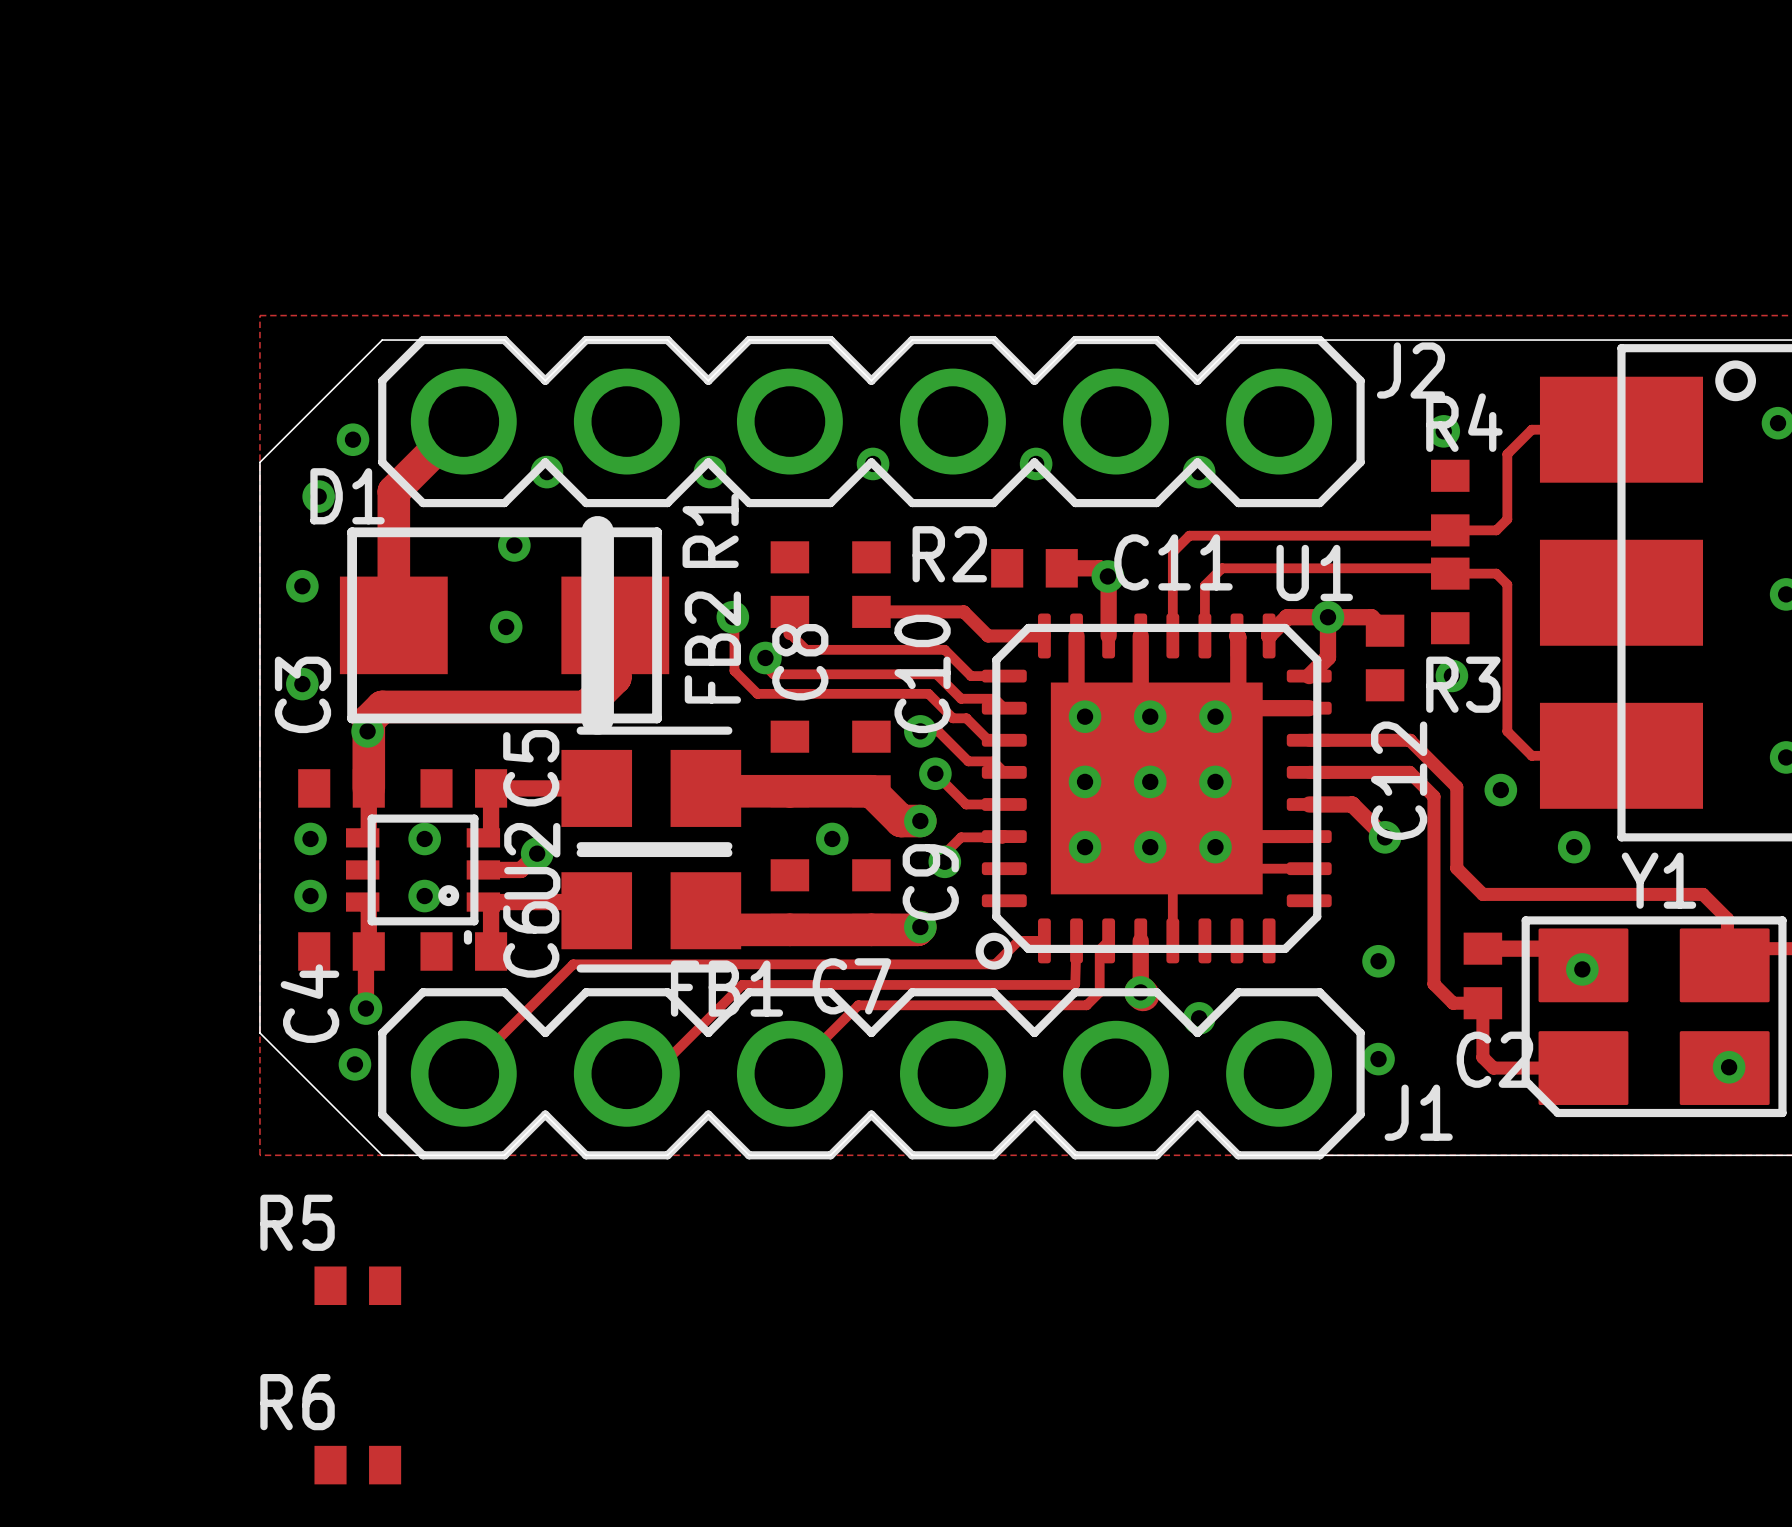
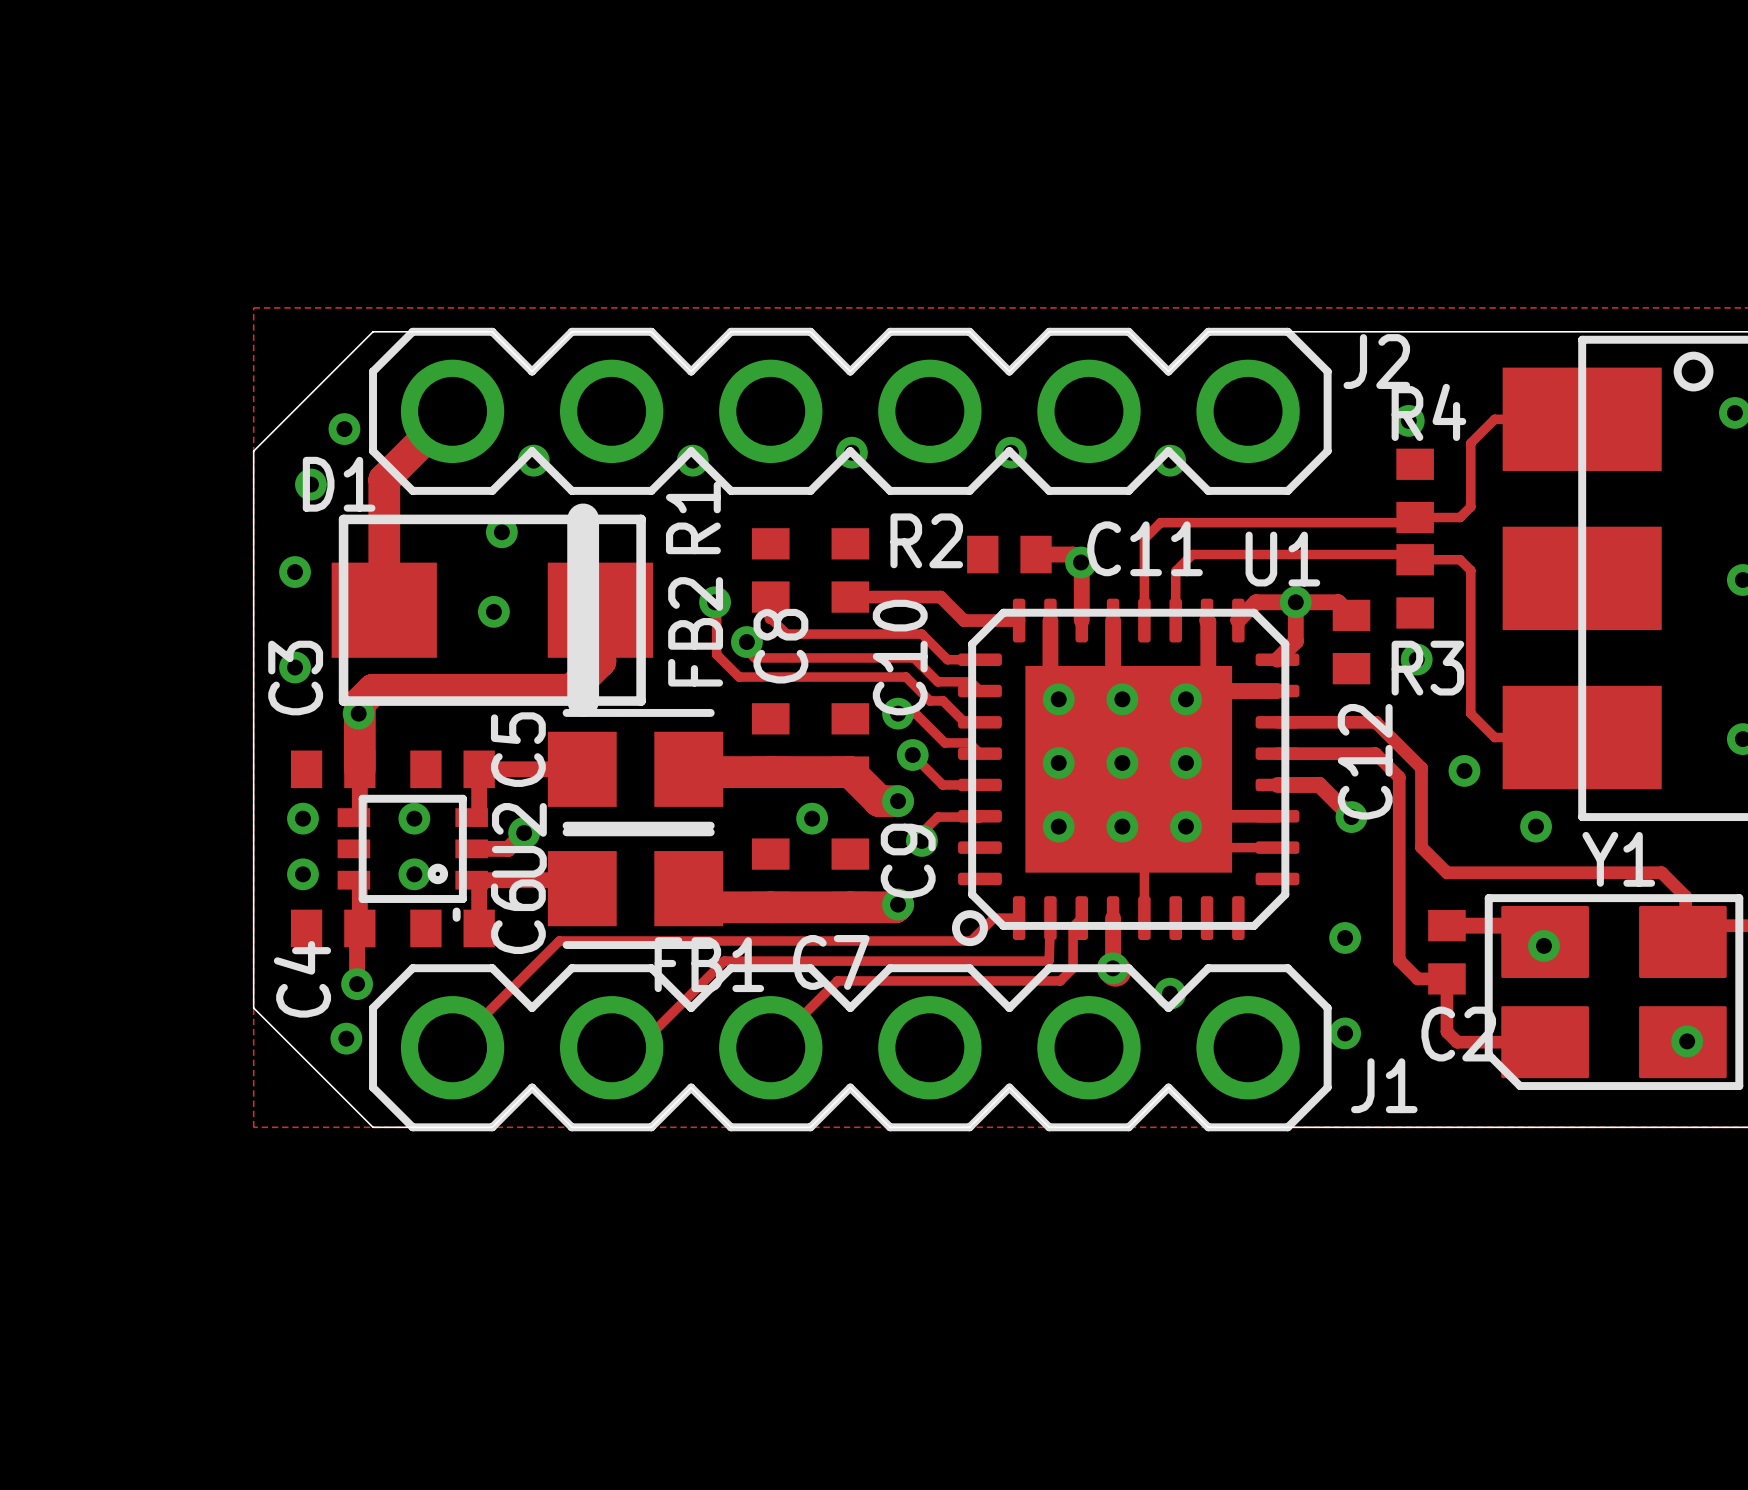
R5: (357, 1285) -> none
R6: (357, 1465) -> none

